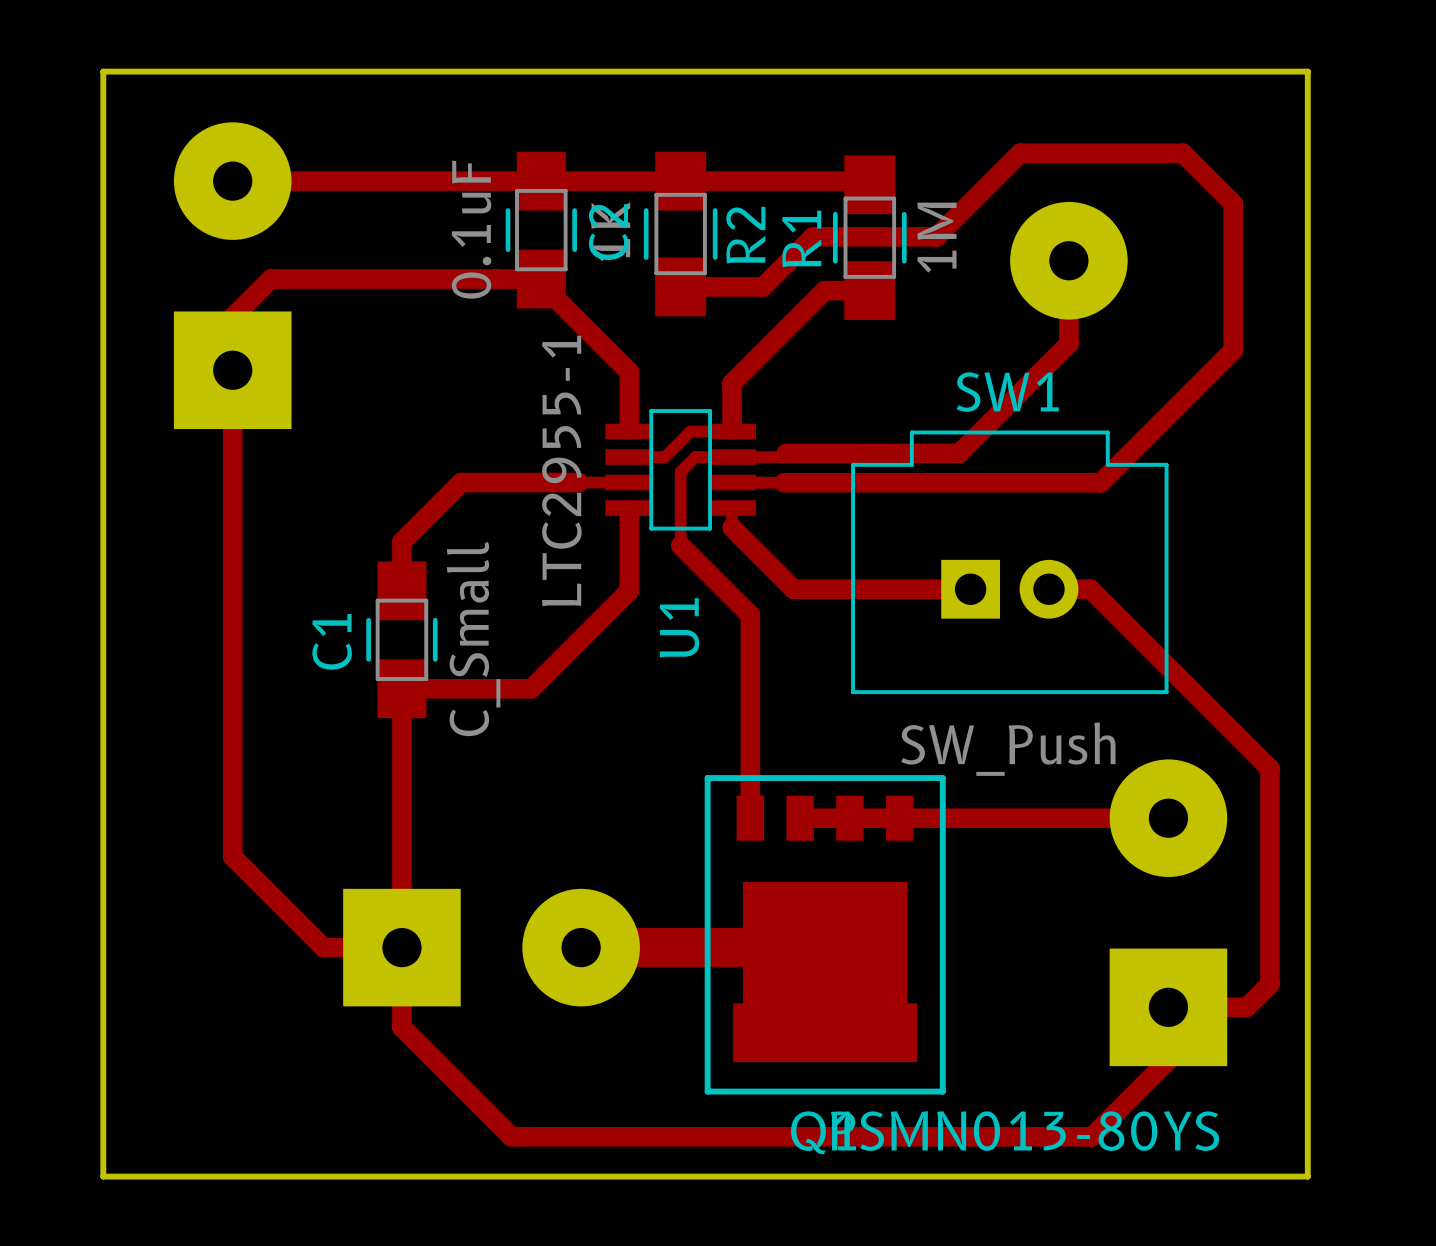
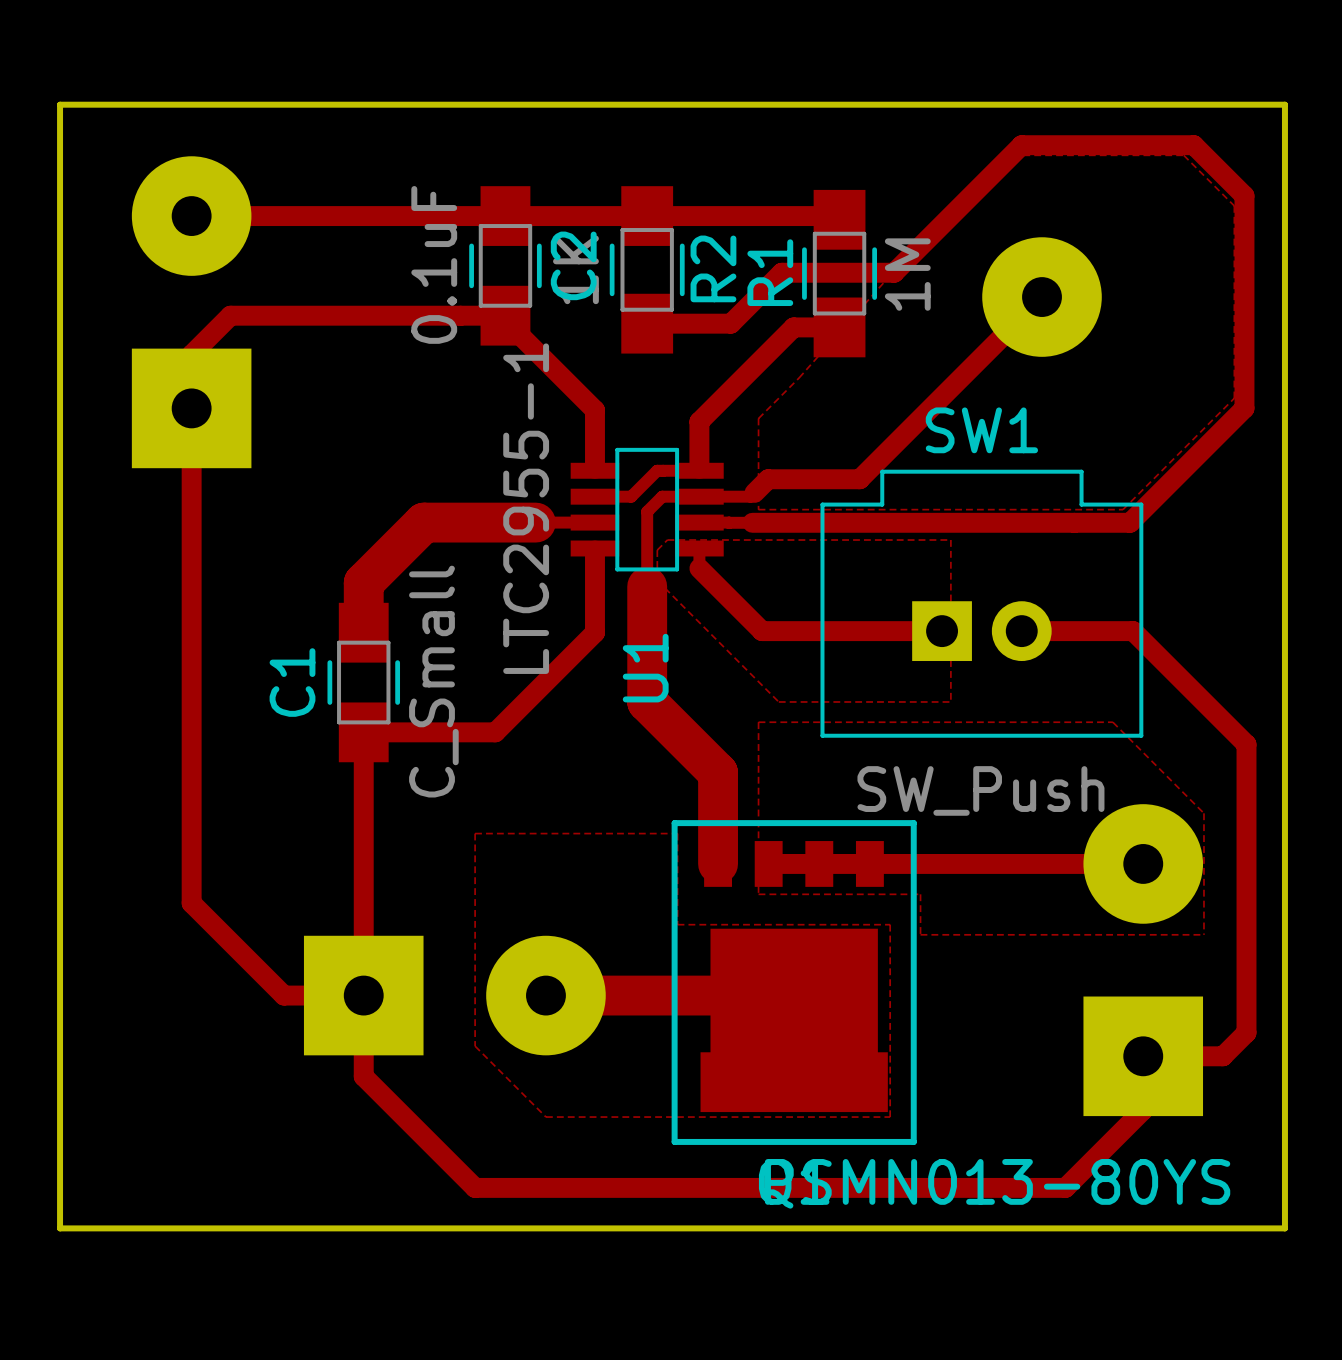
top zone outline: none -> (1001, 155) (1183, 155) (1234, 205) (1234, 398) (1122, 509) (758, 509) (758, 418) (799, 378) (961, 195) (1001, 155)
top track: (923, 236) (936, 236) (1020, 153) (1182, 153) (1233, 203) (1233, 350) (1100, 482) -> (894, 272) (1021, 145) (1193, 145) (1244, 195) (1244, 408) (1130, 522) (1074, 522)
top track: (1068, 260) (1068, 343) (959, 453) (786, 453) -> (1042, 297) (859, 479) (768, 479) (754, 492)
top track width: thin (571, 482) (461, 482) (401, 541) (401, 590) -> thick (535, 522) (424, 522) (363, 582) (363, 632)
top zone outline: none -> (667, 540) (950, 540) (950, 701) (778, 701) (657, 580) (657, 550) (667, 540)
top track: (680, 545) (750, 615) (750, 728) -> (647, 586) (647, 701) (718, 772)
top track: (1090, 589) (1269, 768) -> (1064, 631) (1133, 631) (1246, 744) (1246, 813)
top zone outline: none -> (758, 722) (758, 894) (920, 894) (920, 934) (1203, 934) (1203, 813) (1112, 722) (758, 722)
top track width: thin (750, 728) (750, 818) -> thick (718, 772) (718, 863)
top zone outline: none -> (475, 833) (475, 1046) (545, 1117) (890, 1117) (890, 924) (677, 924) (677, 833) (475, 833)

